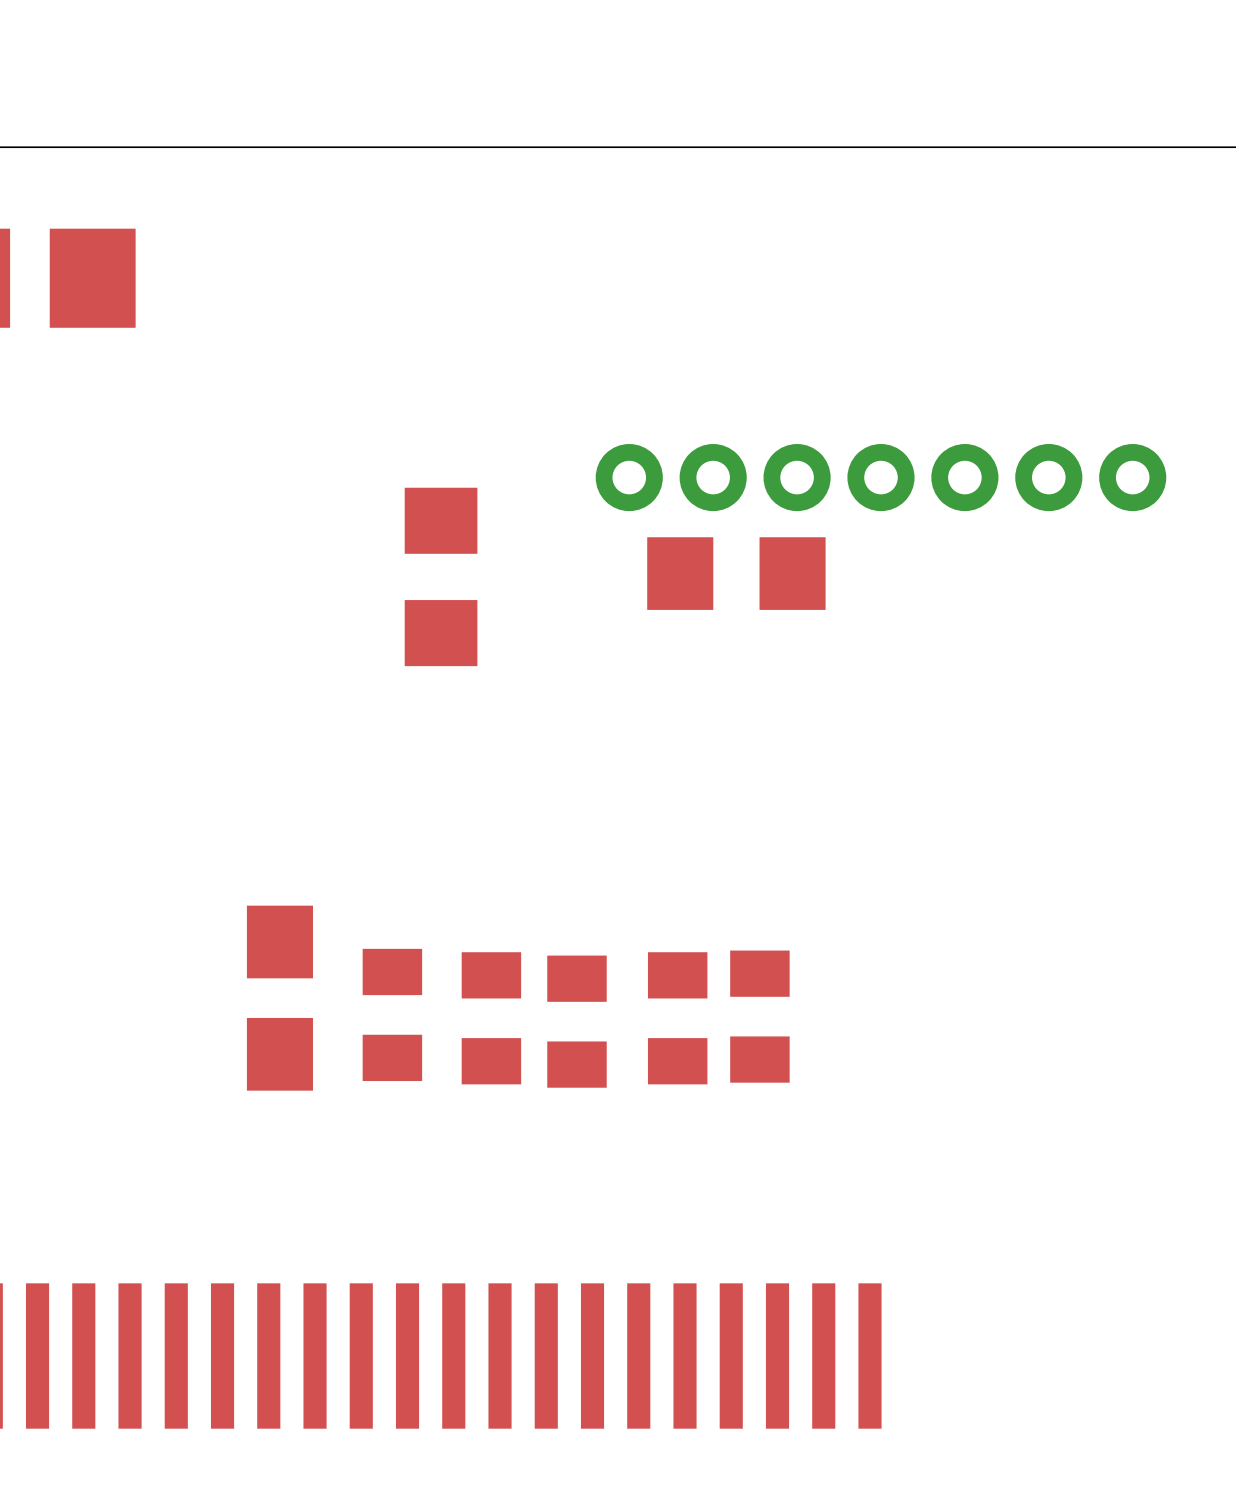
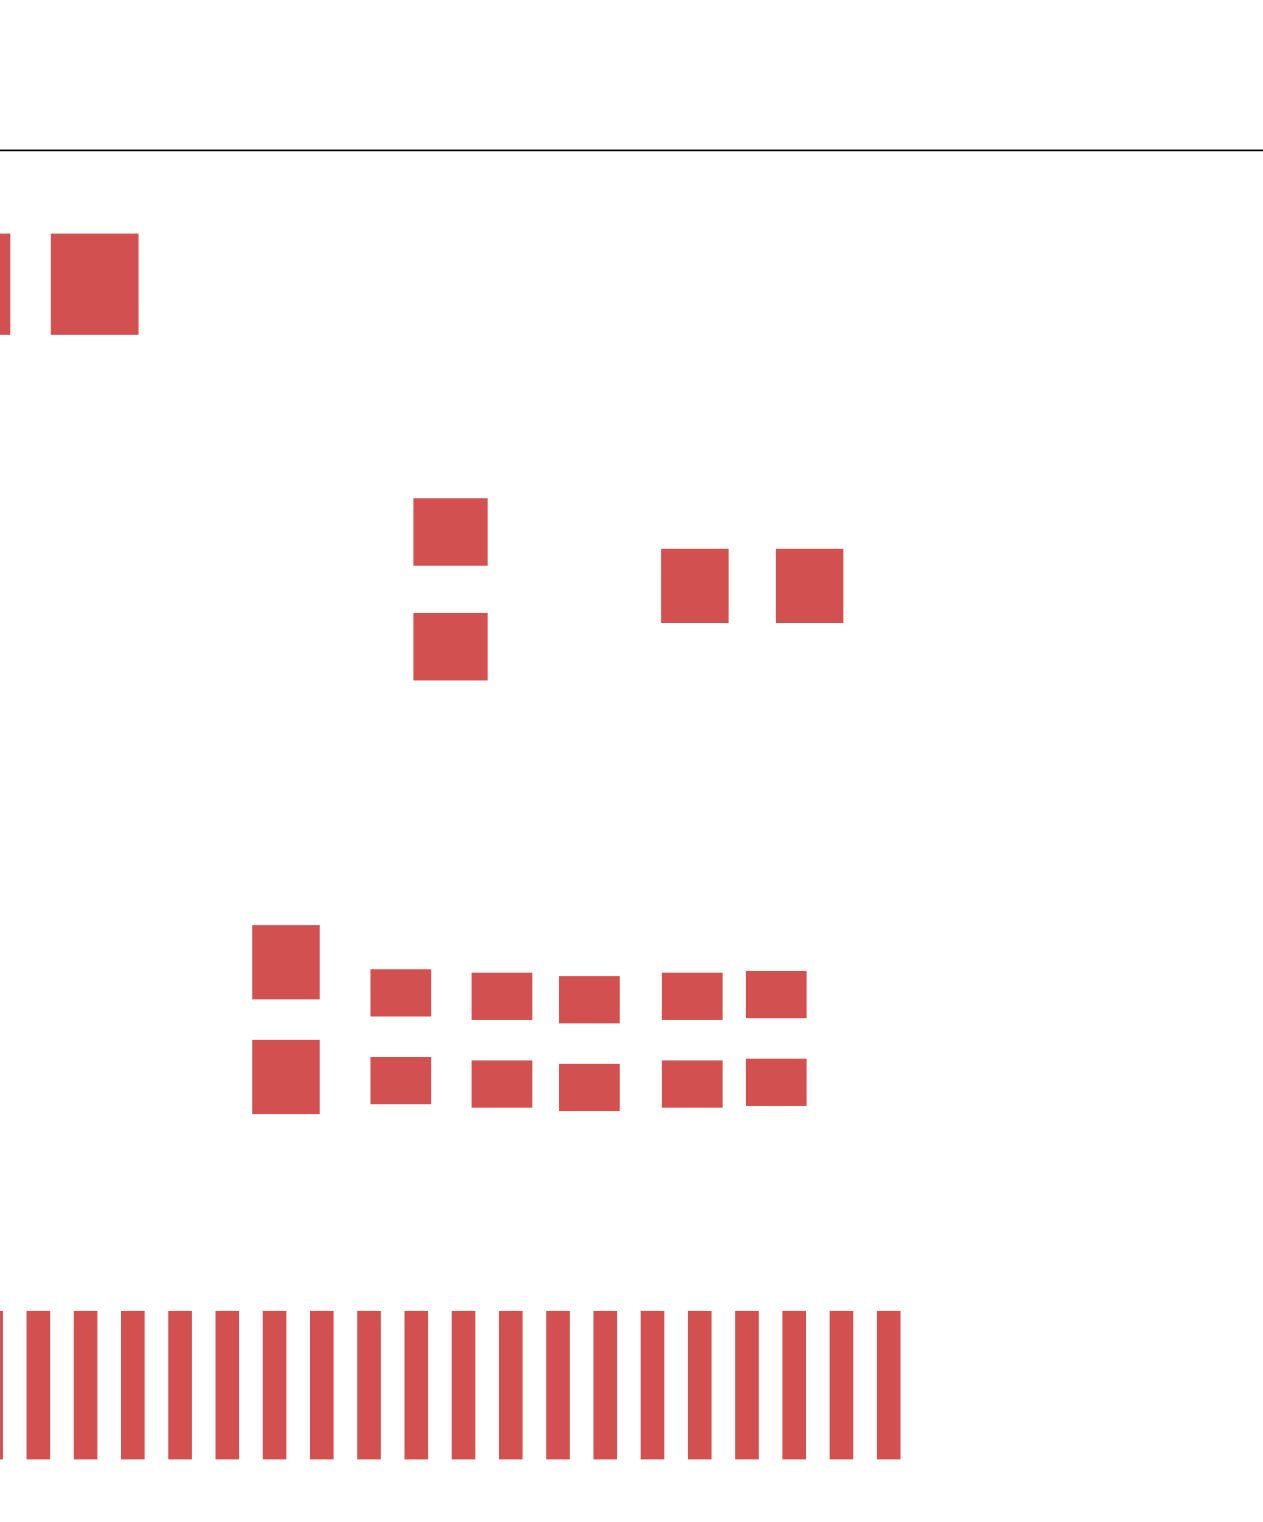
part: (880, 477) -> none

